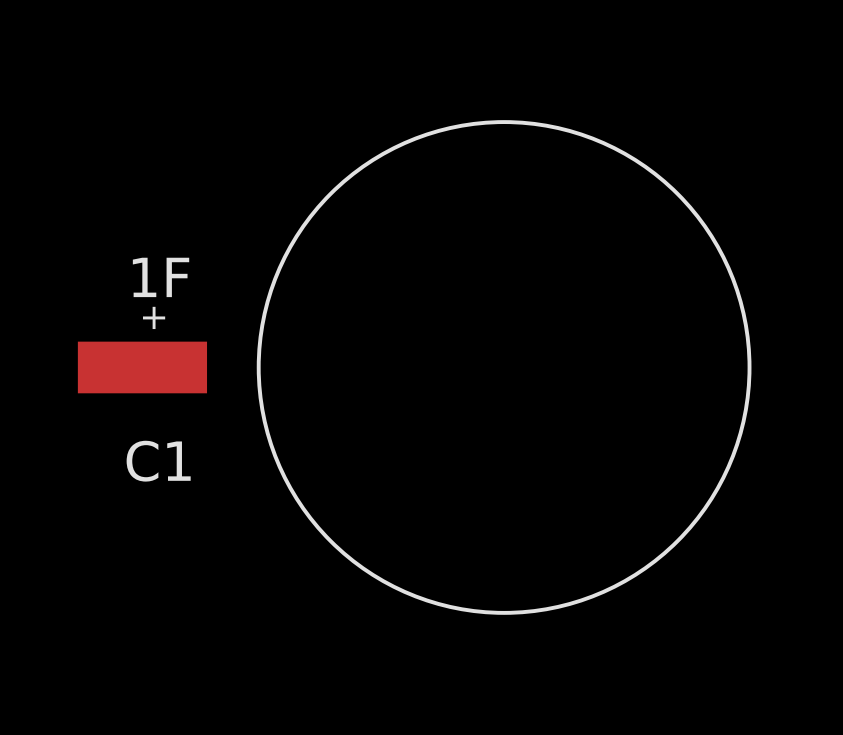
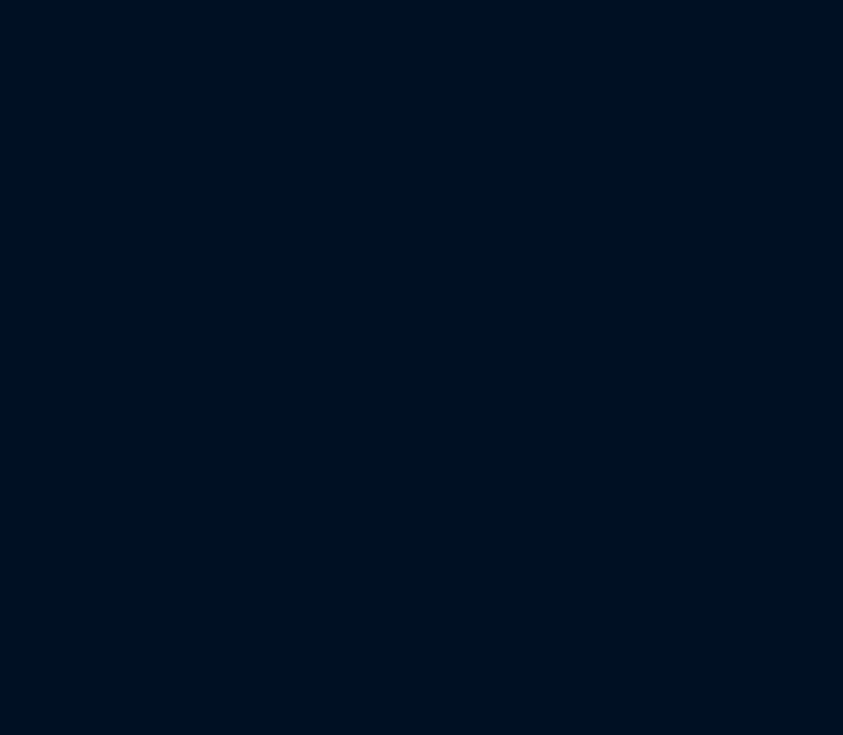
C1: 1F (414, 367) -> none

